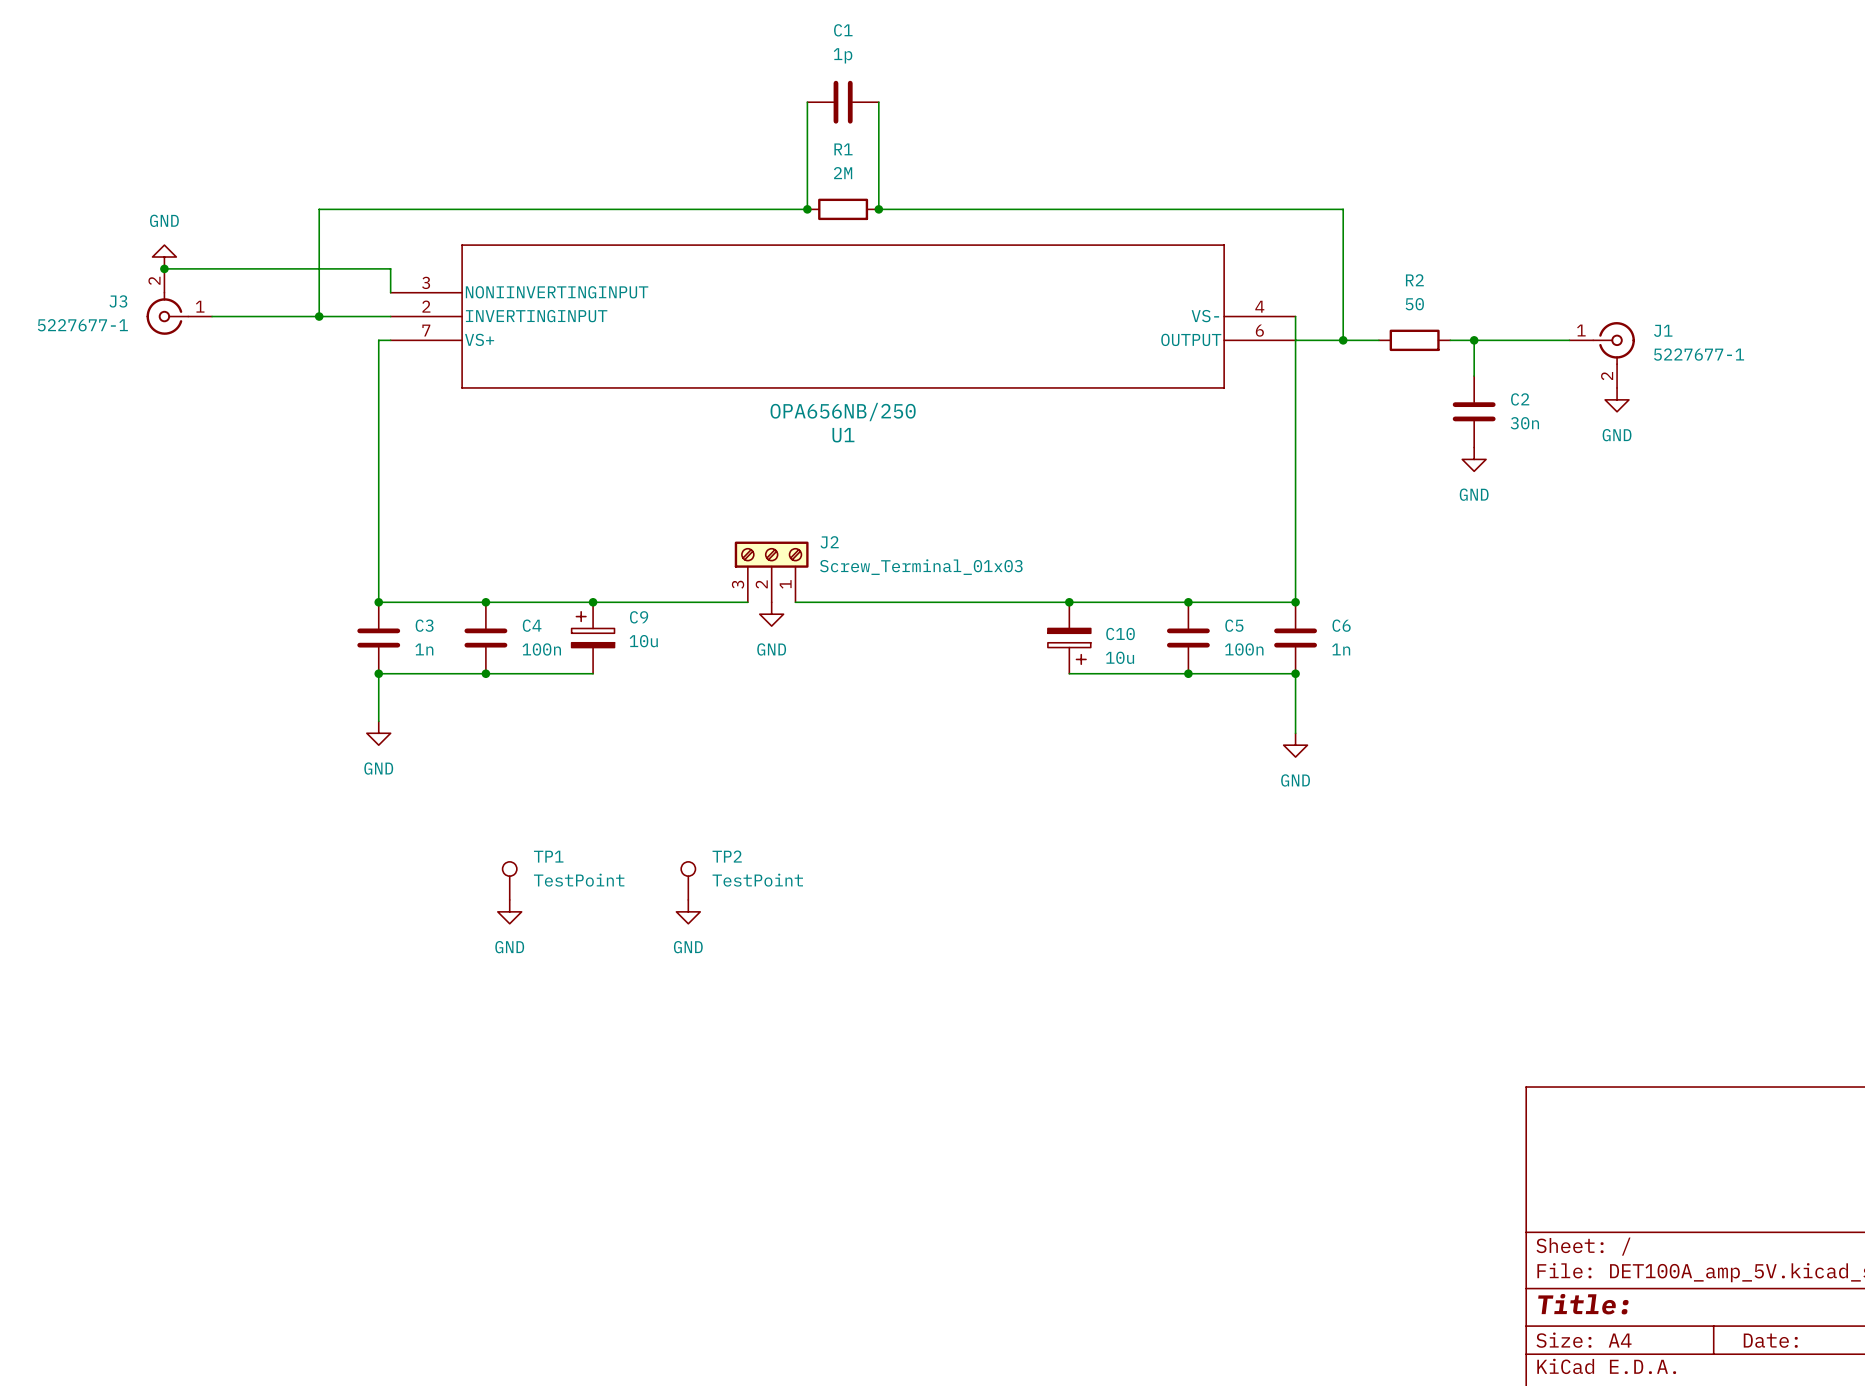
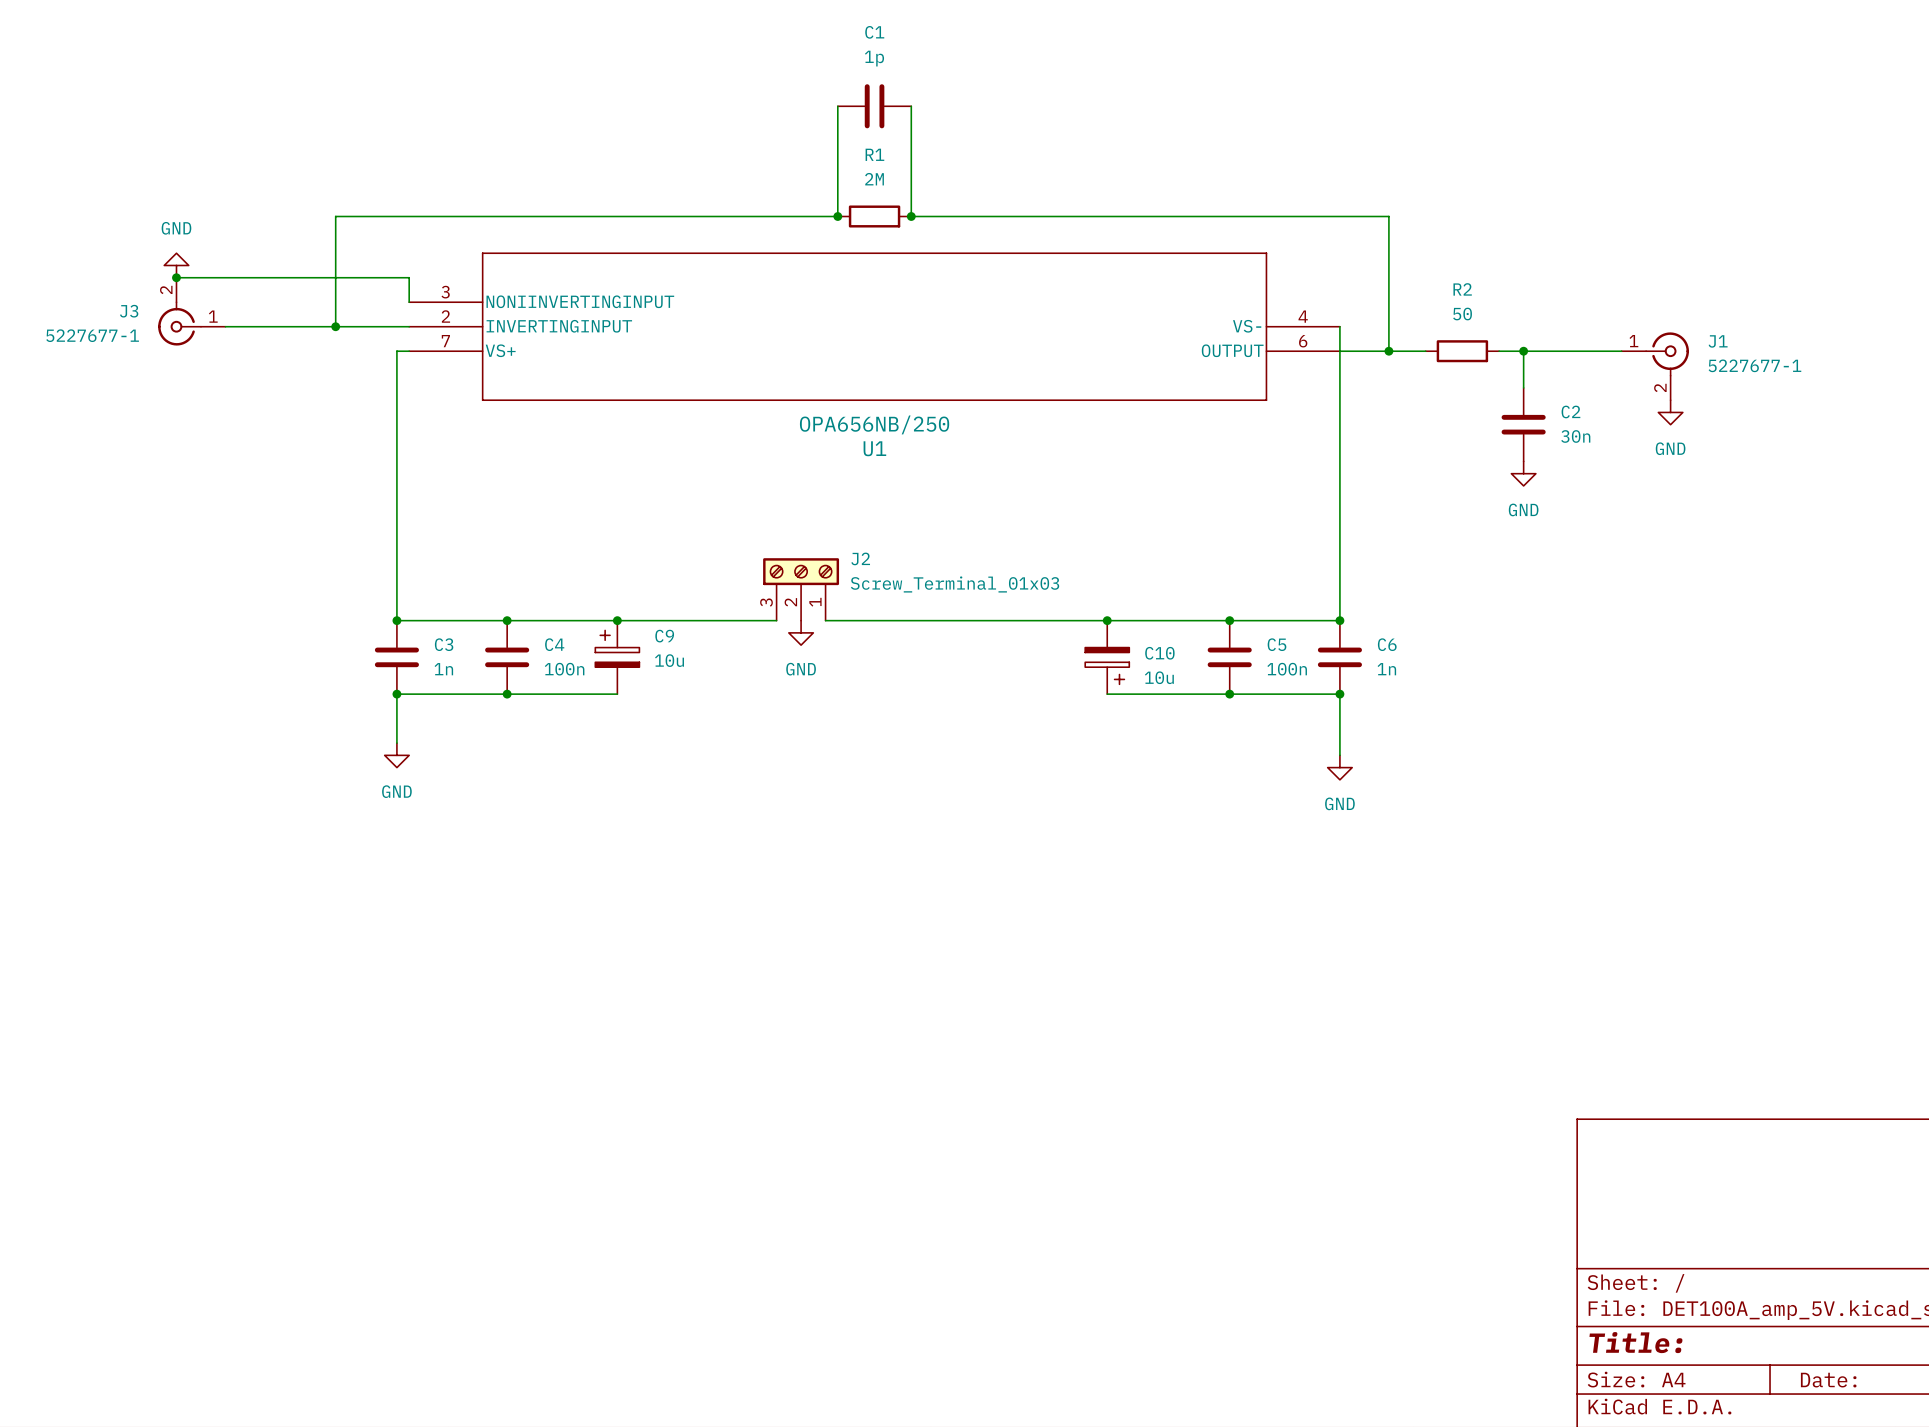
TP1: TestPoint (509, 880) -> none
TP2: TestPoint (688, 880) -> none
power symbol: GND (509, 911) -> none
power symbol: GND (688, 911) -> none

